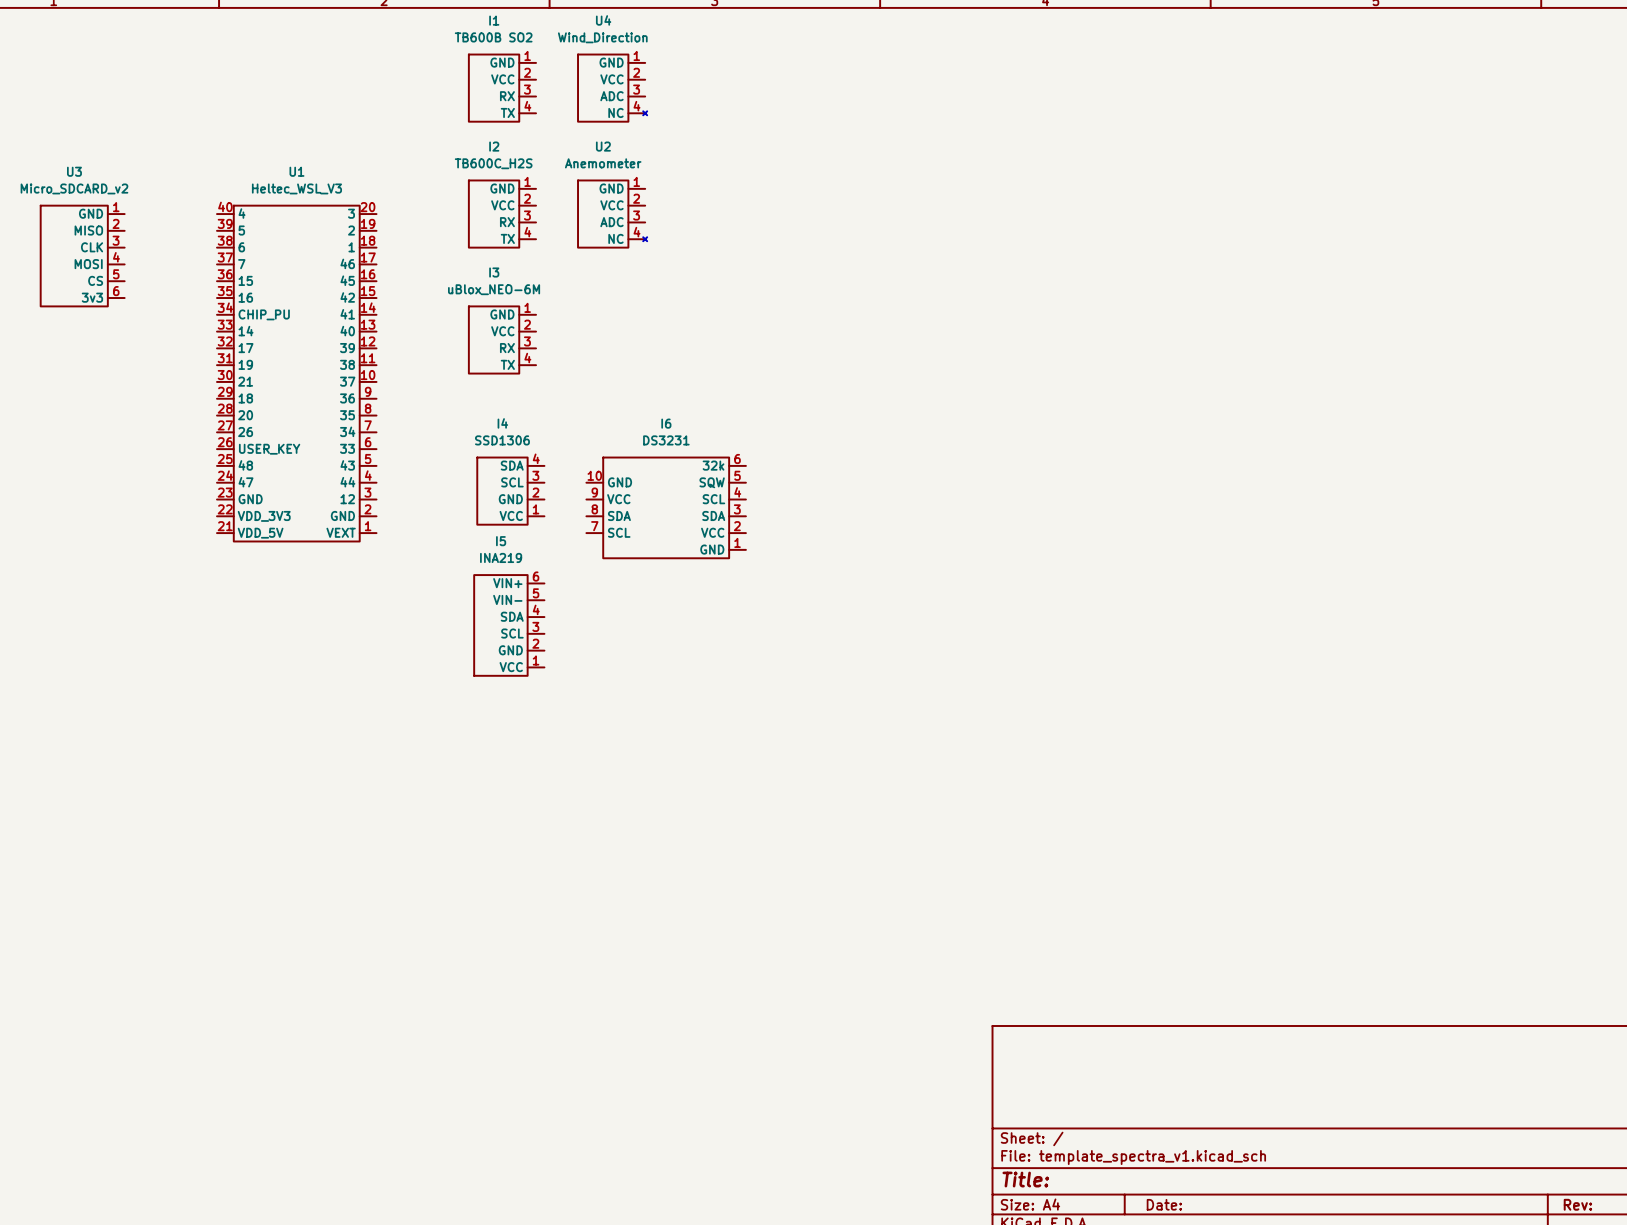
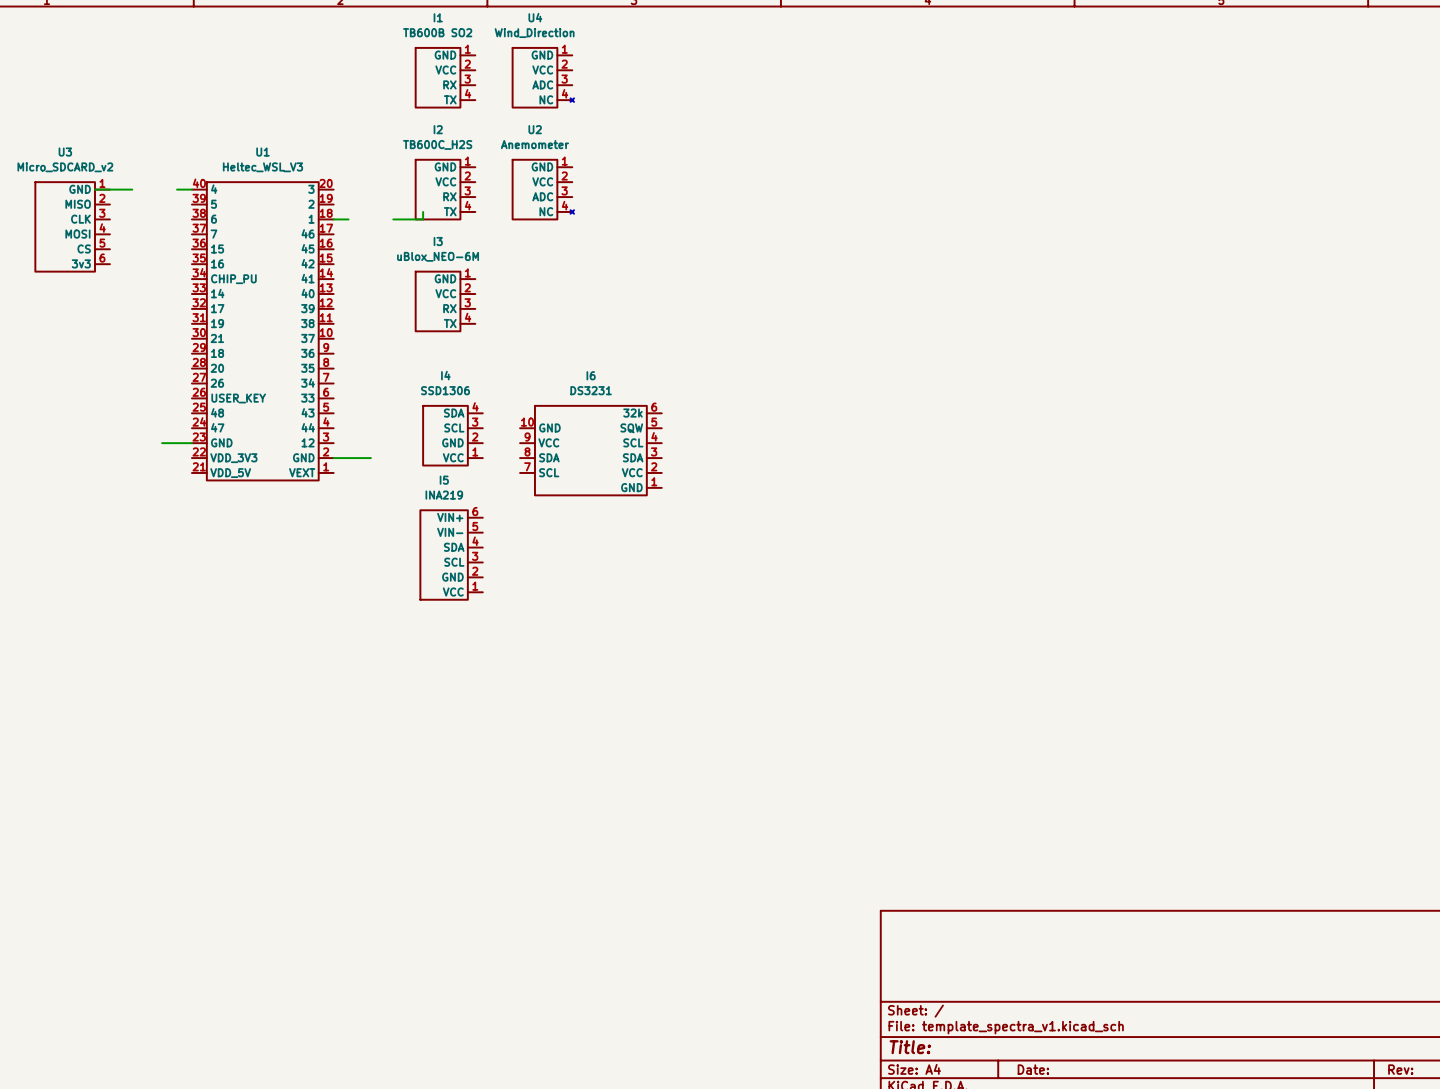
wire: none -> (95, 189) (132, 189)
wire: none -> (177, 189) (191, 189)
wire: none -> (423, 211) (423, 219) (393, 219)
wire: none -> (333, 219) (348, 219)
wire: none -> (162, 443) (191, 443)
wire: none -> (333, 458) (370, 458)

